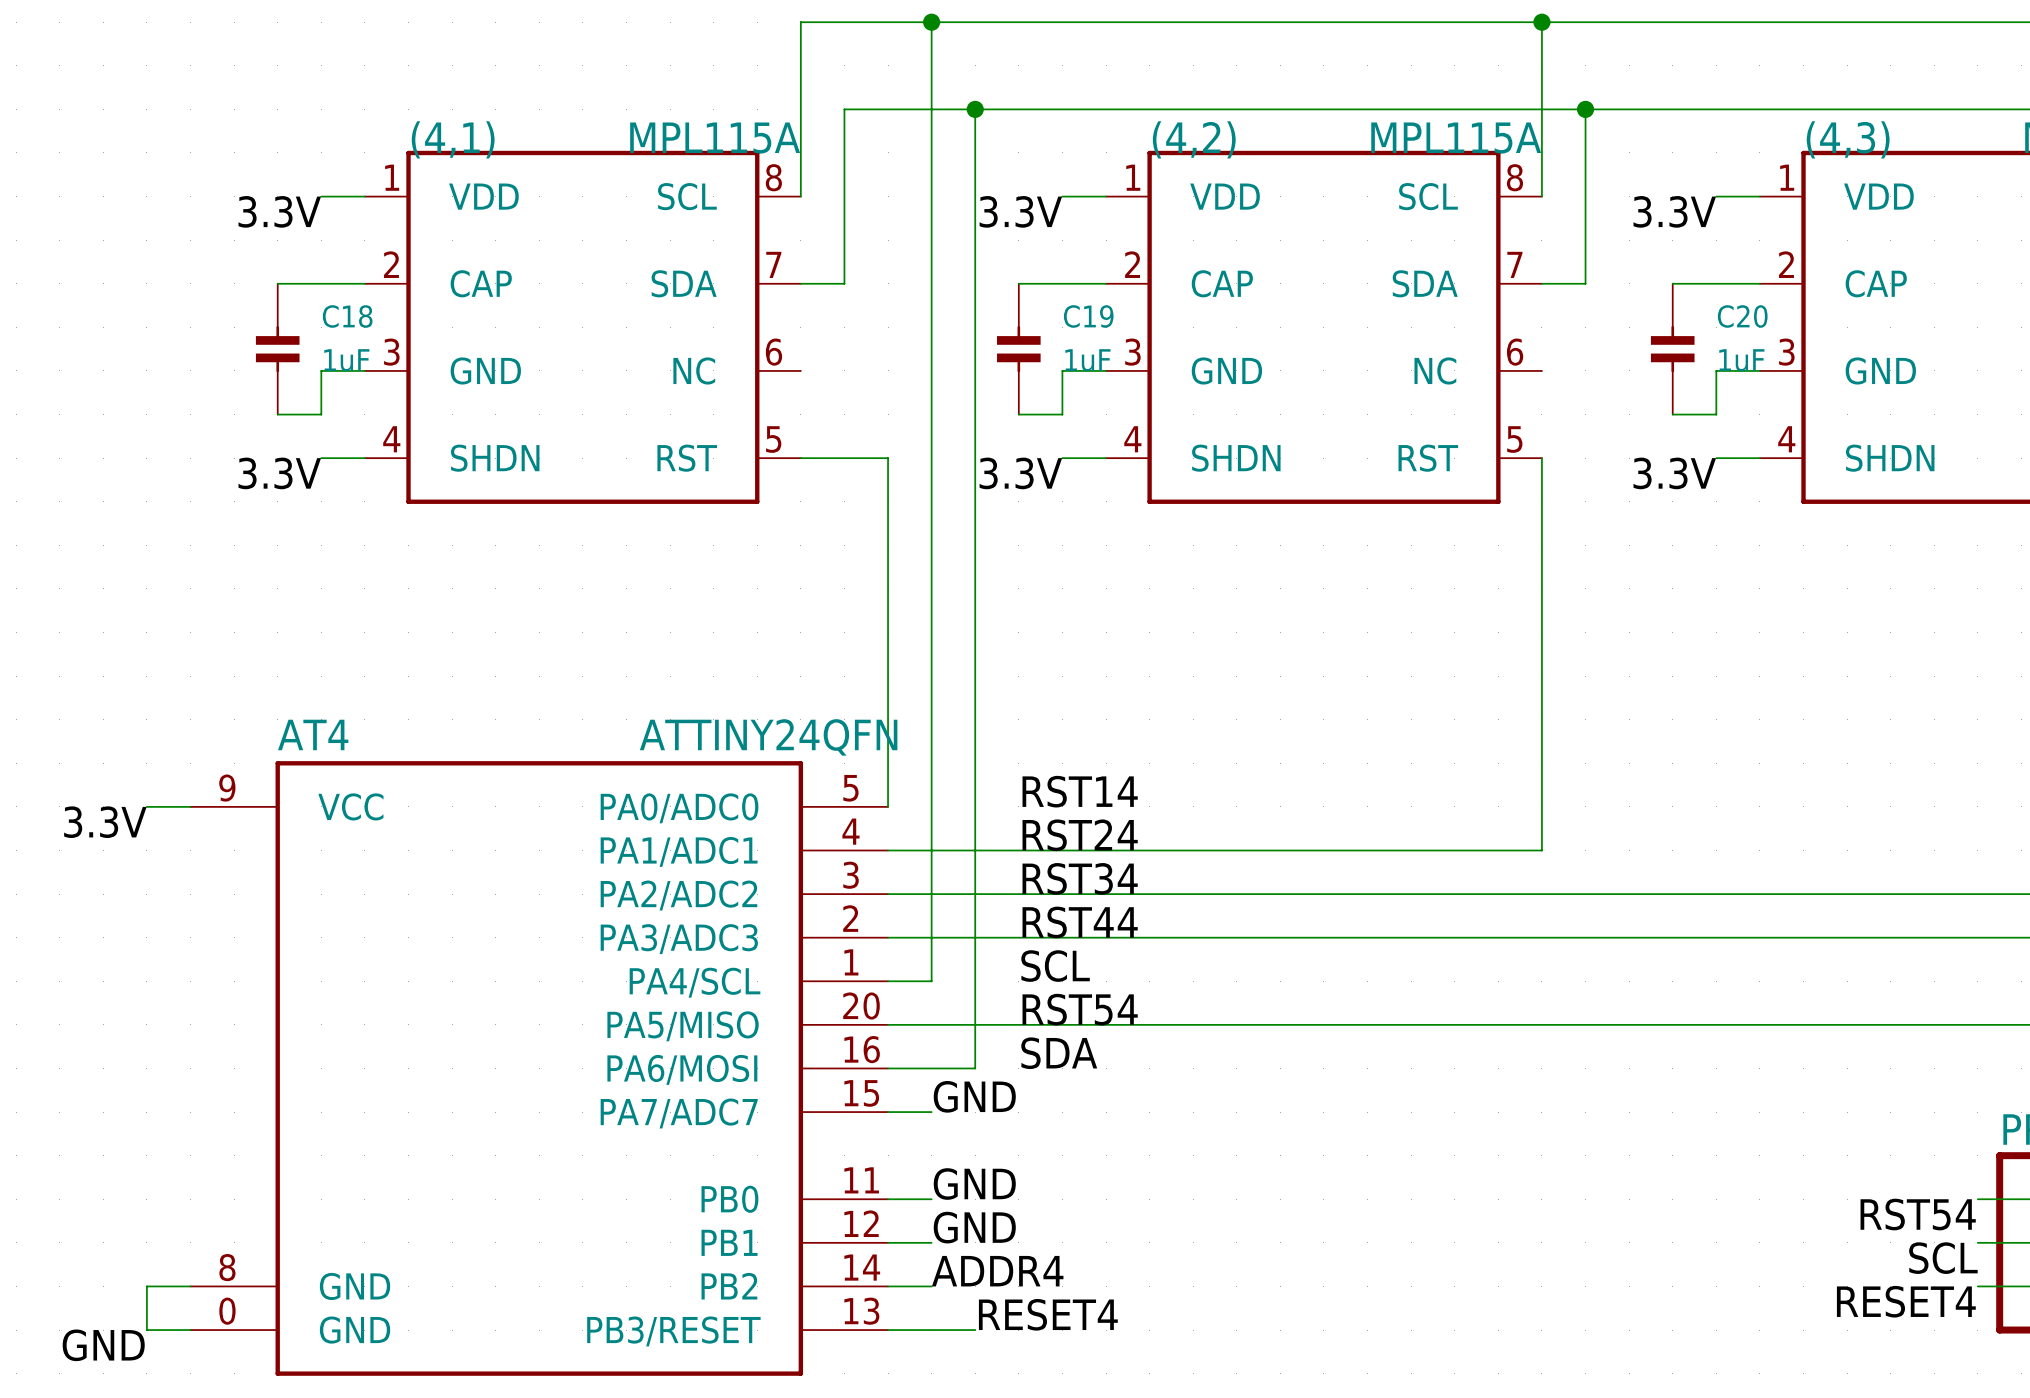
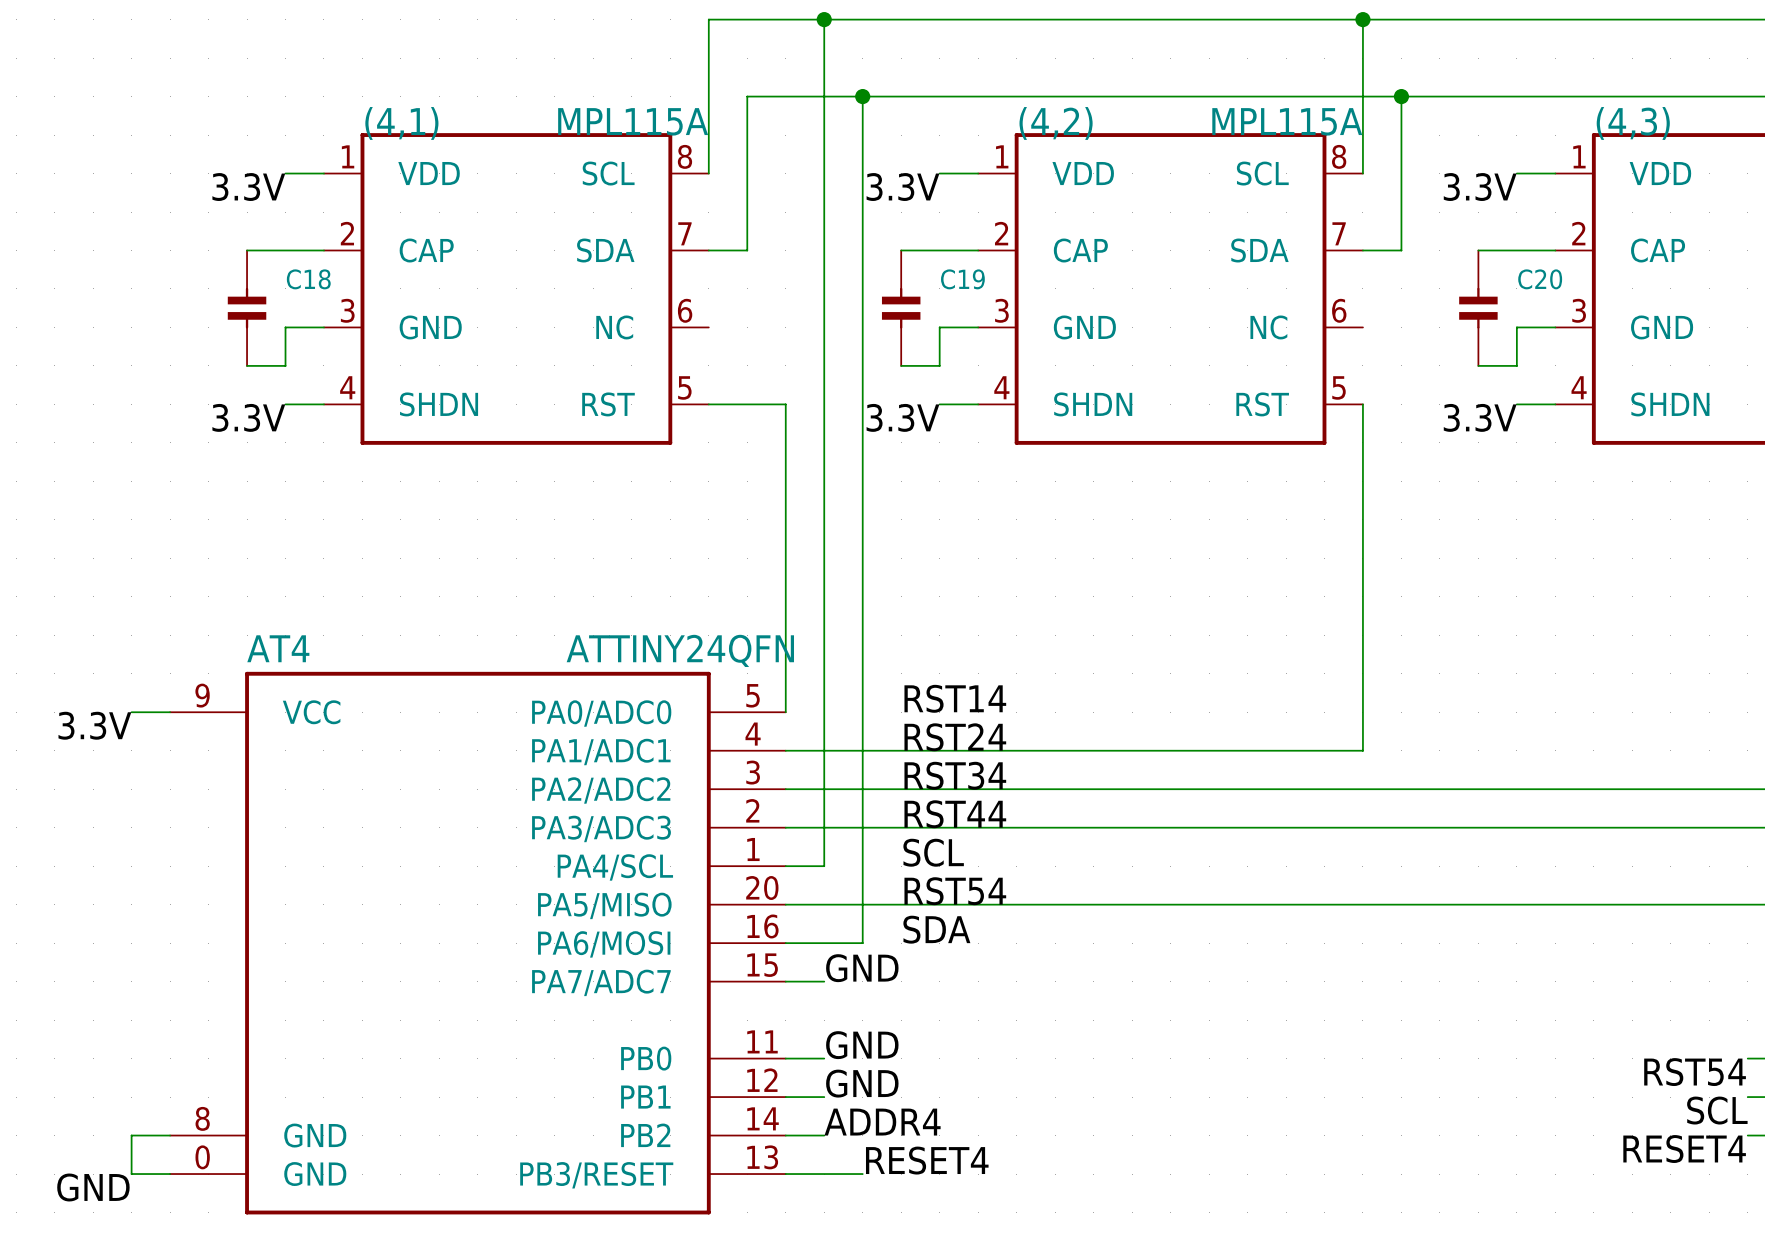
C18 value: 1uF (346, 360) -> none
C19 value: 1uF (1087, 360) -> none
C20 value: 1uF (1741, 360) -> none

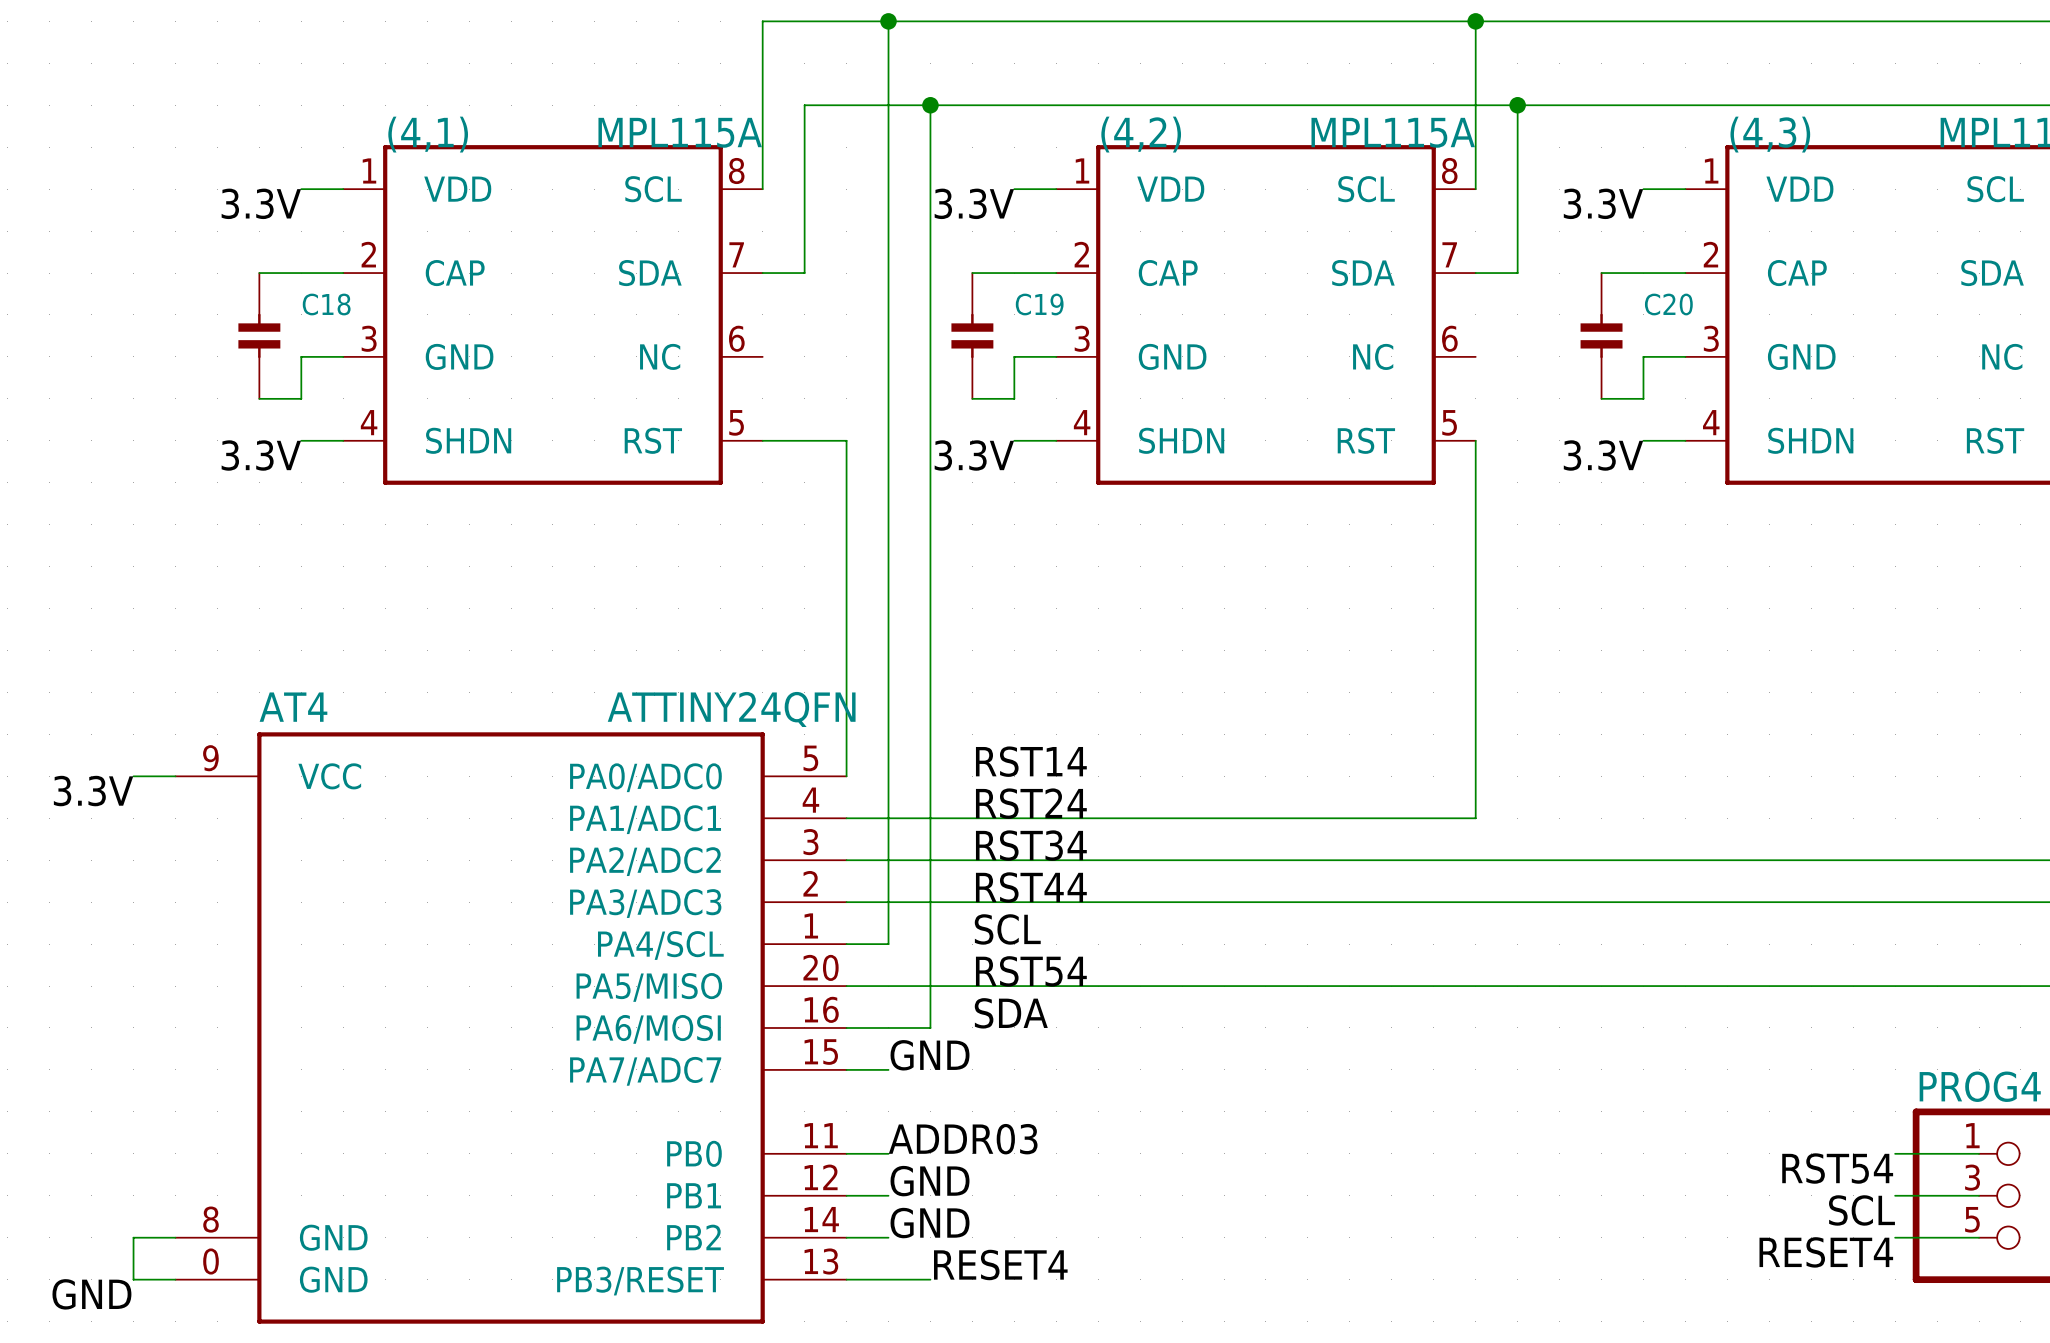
label: GND (862, 1045) -> ADDR03 (963, 1139)
label: ADDR4 (882, 1122) -> GND (930, 1223)

